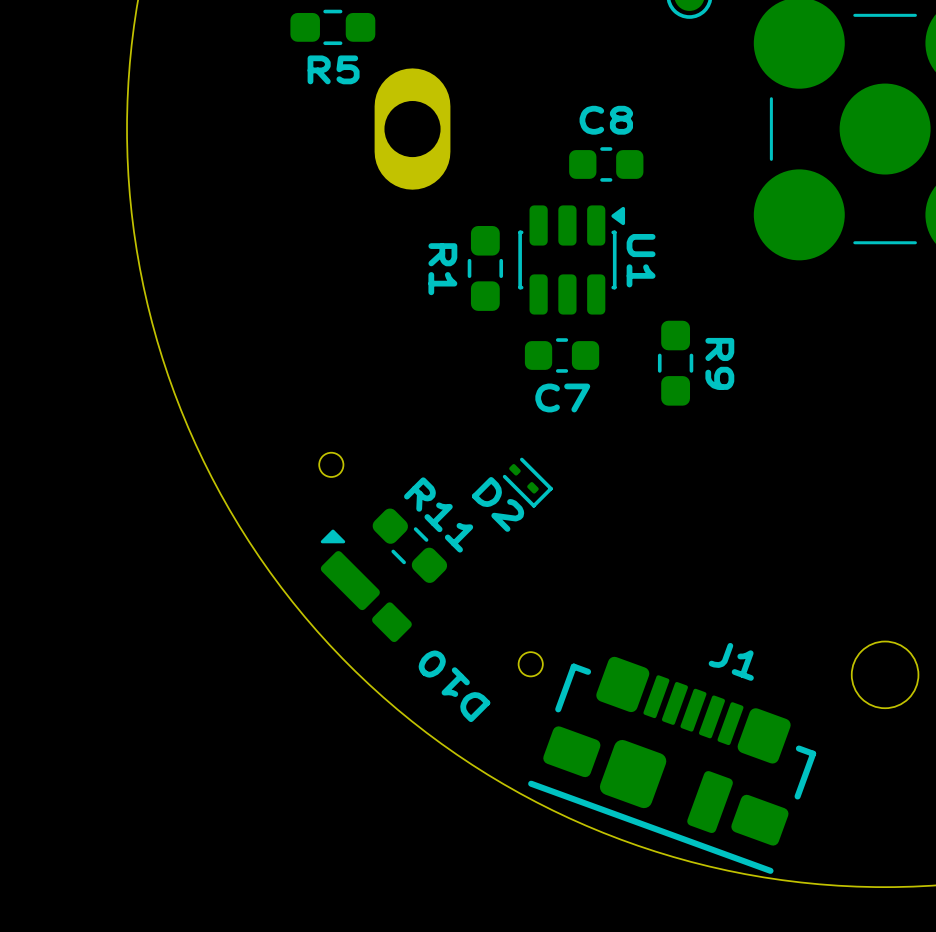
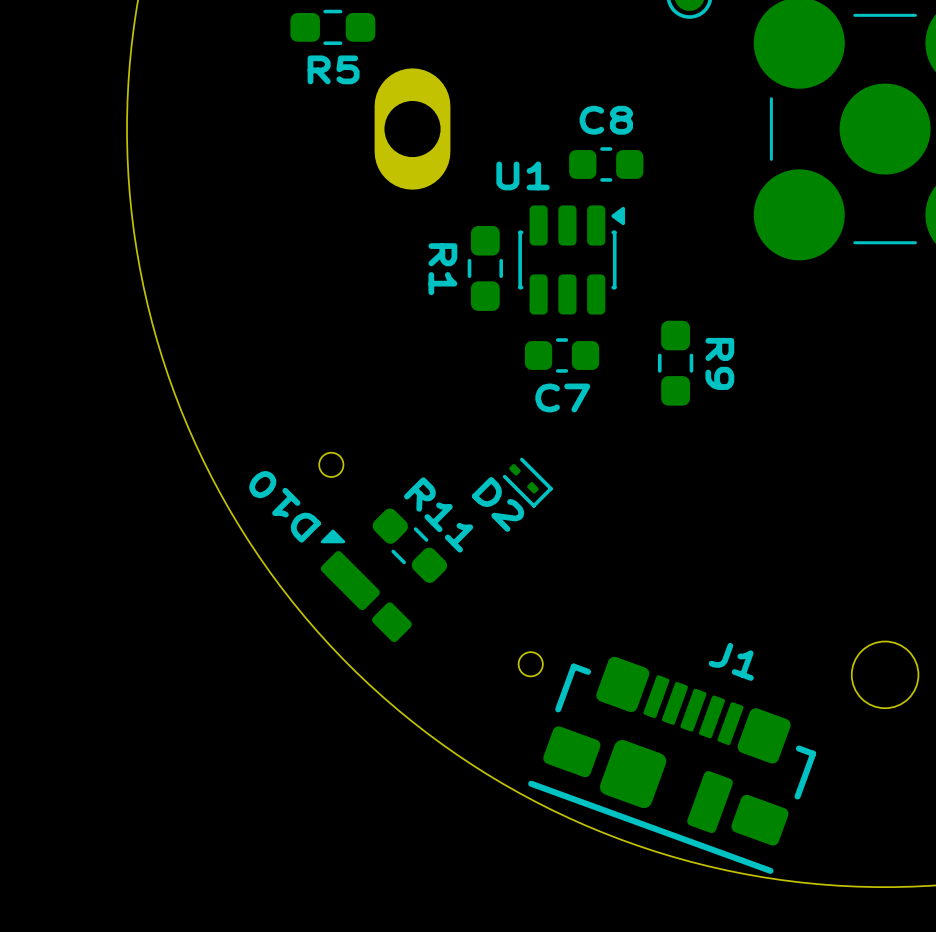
U1 name rotation: 0° (641, 260) -> 90° counterclockwise (523, 175)
U1 name position: U1 (641, 260) -> U1 (523, 175)
D10 name position: D10 (454, 686) -> D10 (285, 506)

